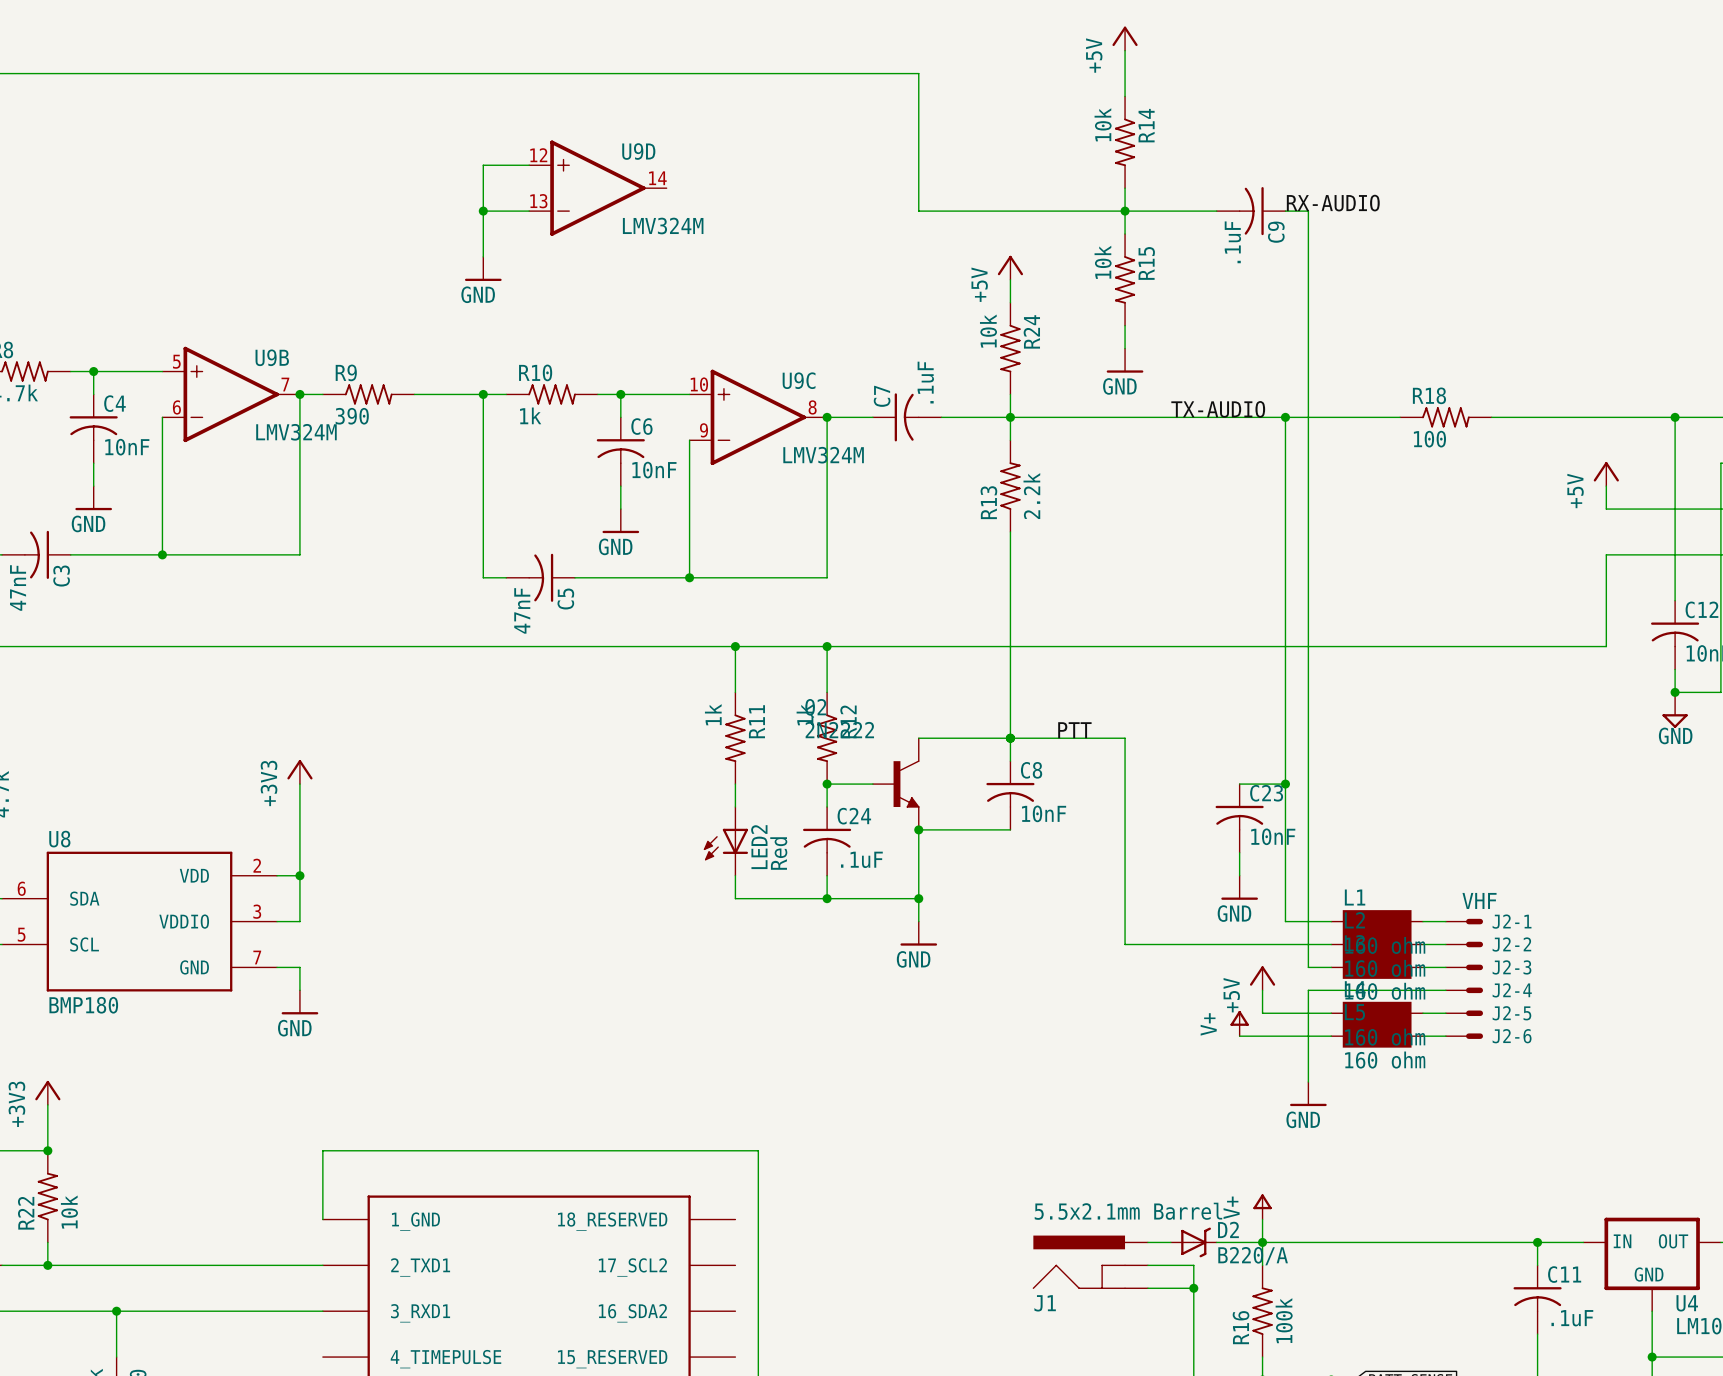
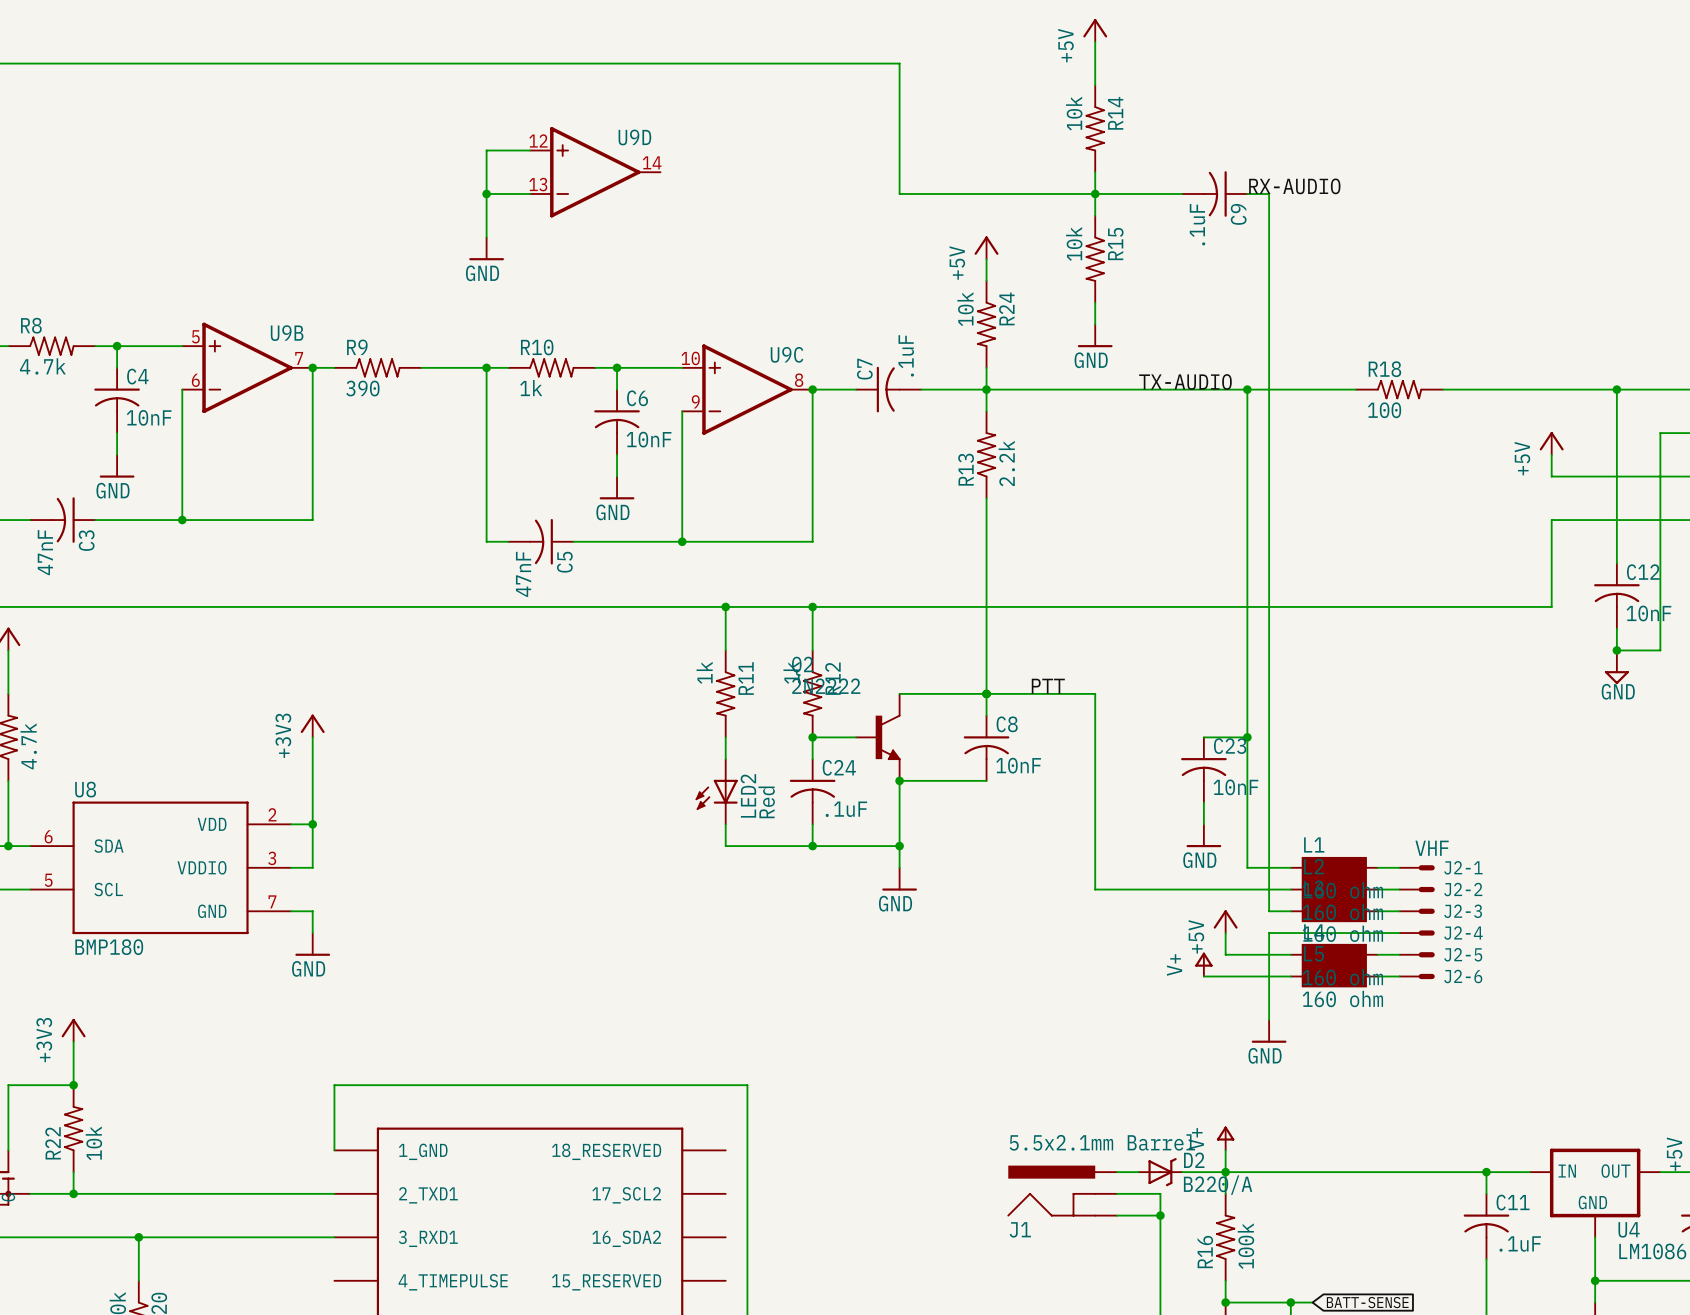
U9D value: LMV324M (663, 226) -> none
U9B value: LMV324M (296, 432) -> none
U9C value: LMV324M (823, 455) -> none

